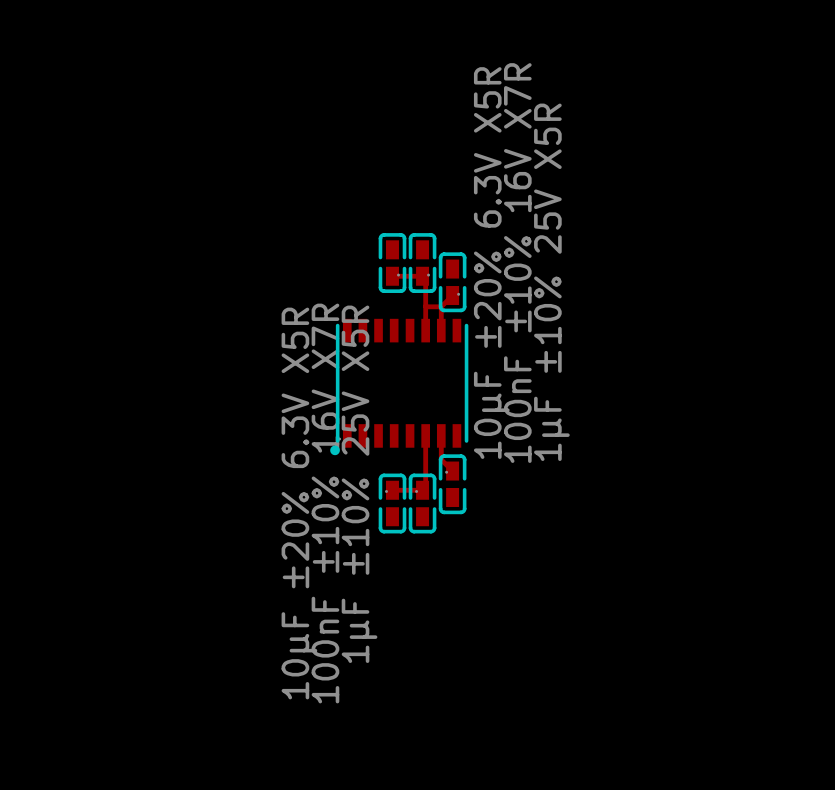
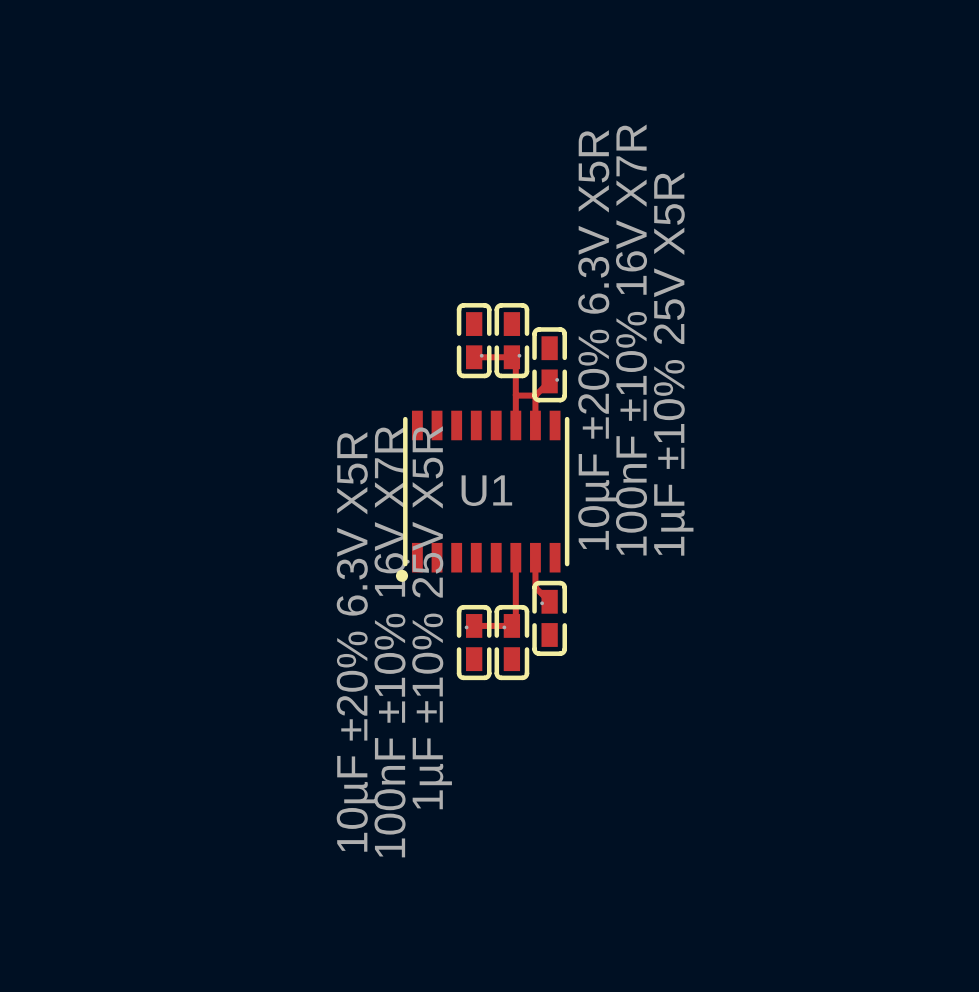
U1 name: none -> U1 (486, 490)

